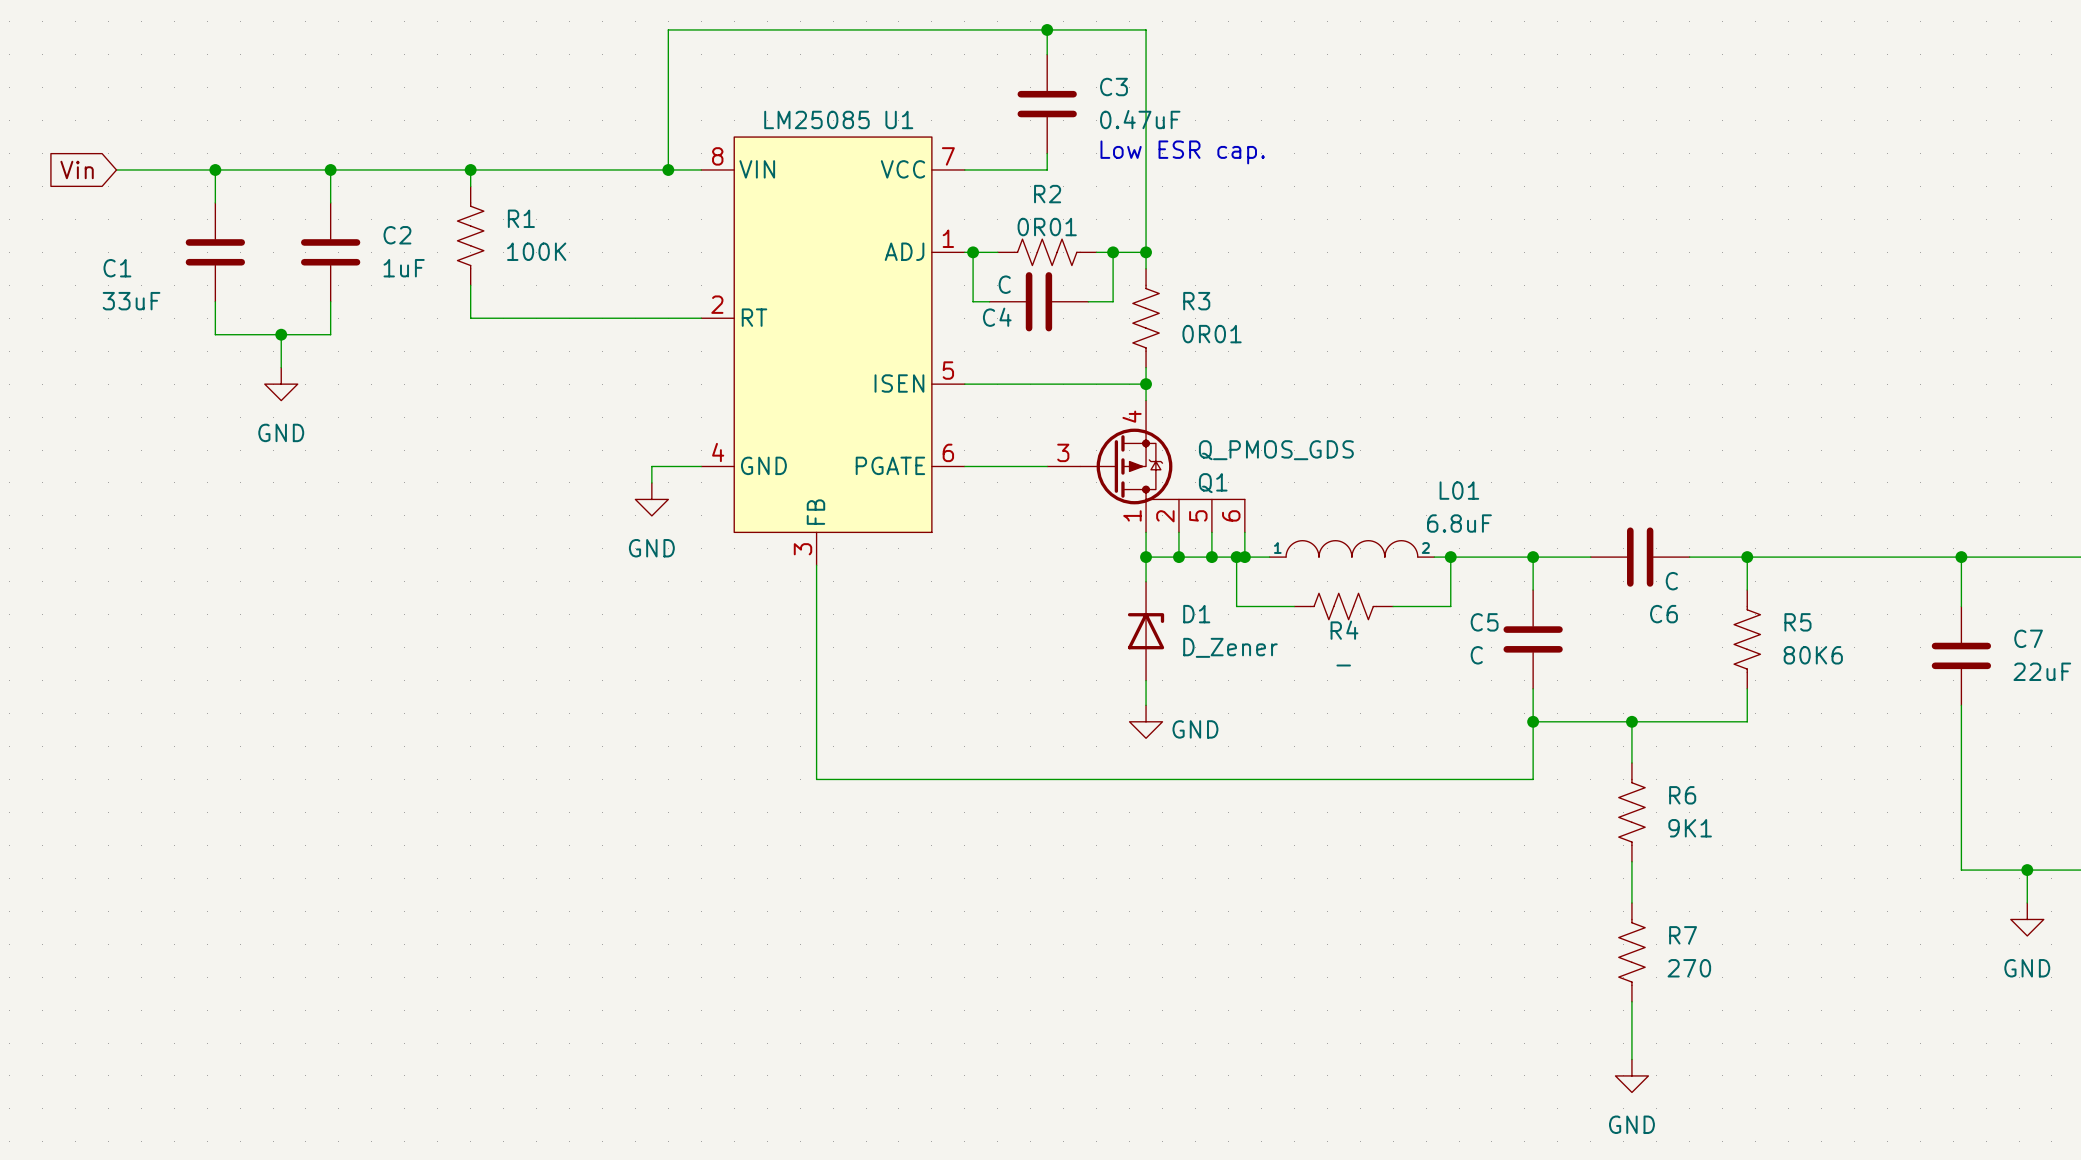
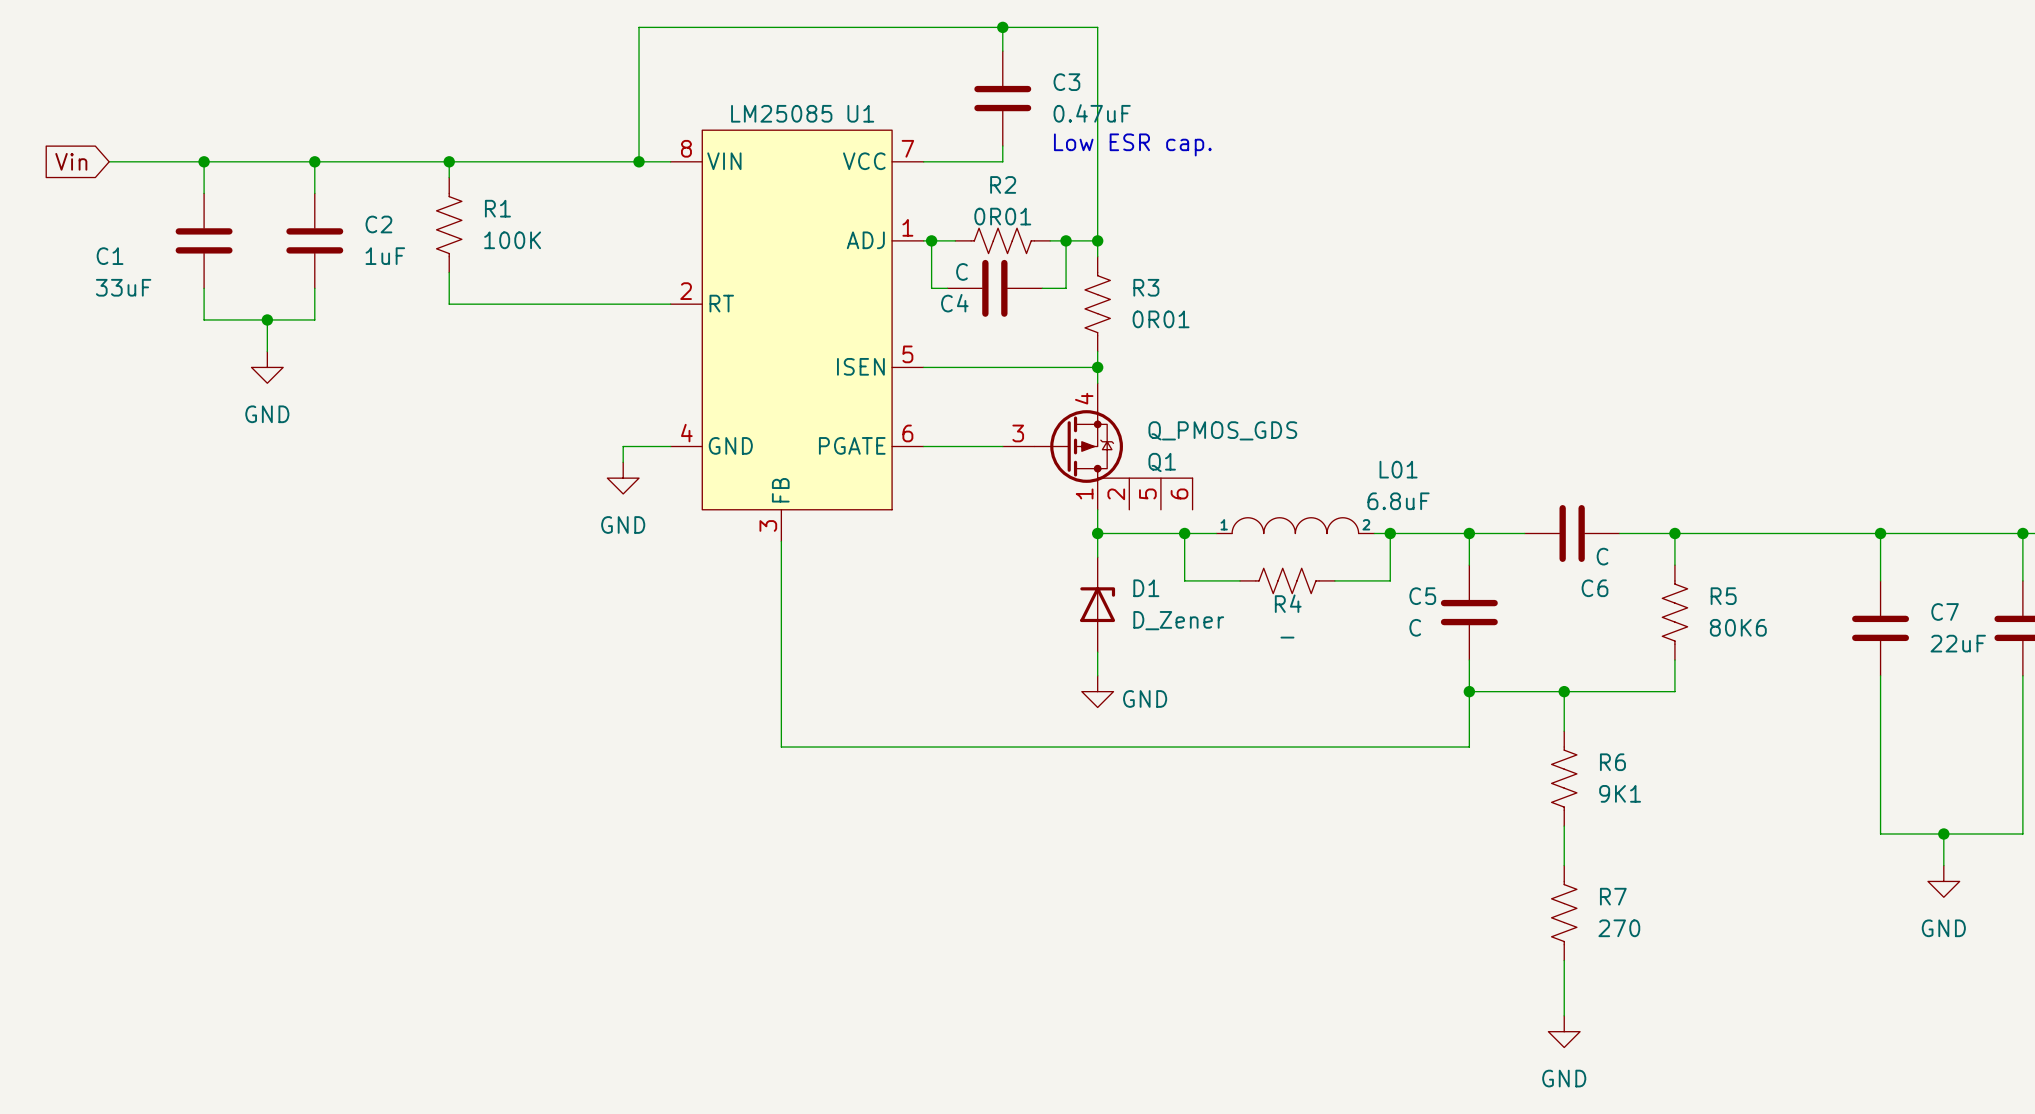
wire: (1178, 532) (1178, 557) -> none
wire: (1211, 532) (1211, 557) -> none
wire: (1244, 532) (1244, 557) -> none
junction: (1178, 557) -> none
junction: (1211, 557) -> none
junction: (1244, 557) -> none

